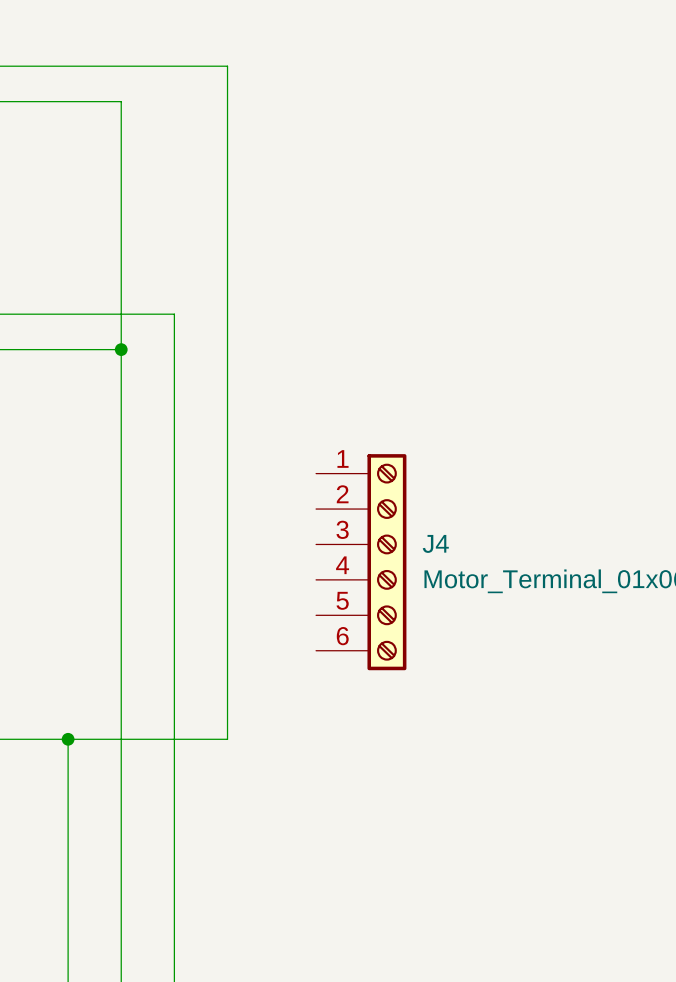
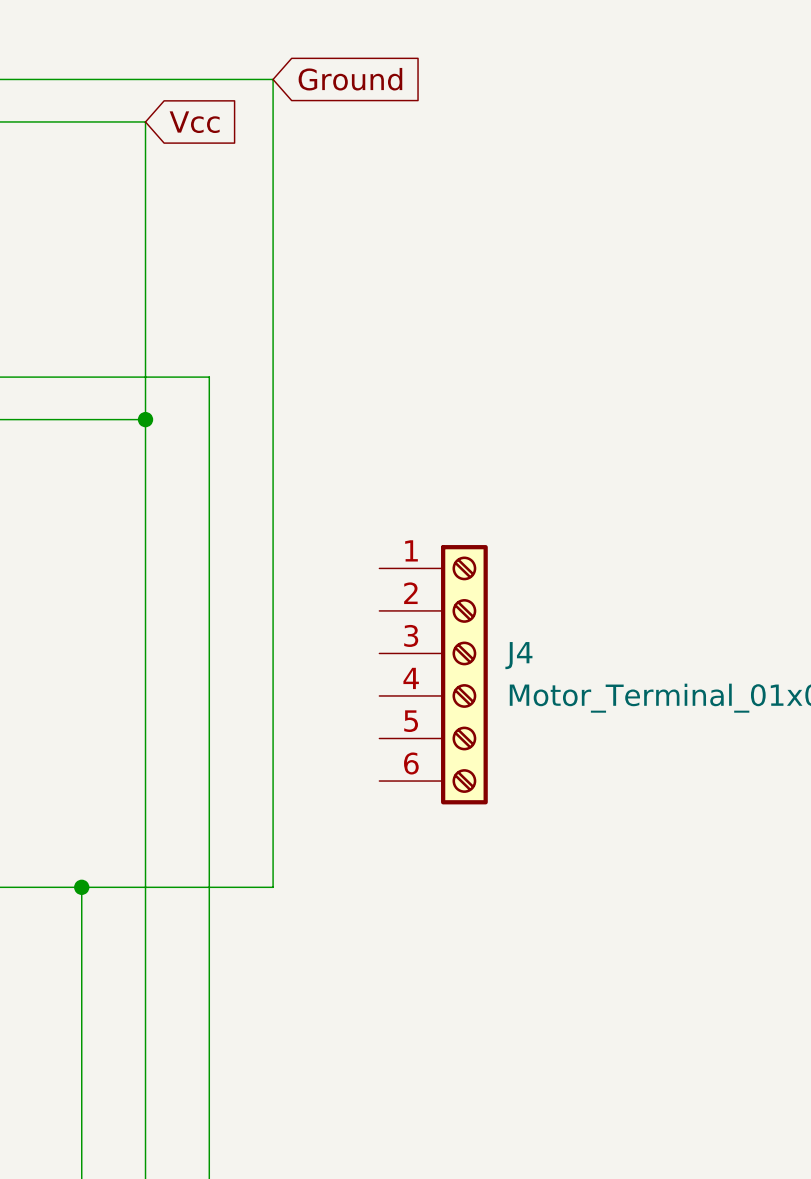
global label: none -> Ground (350, 79)
global label: none -> Vcc (194, 122)

